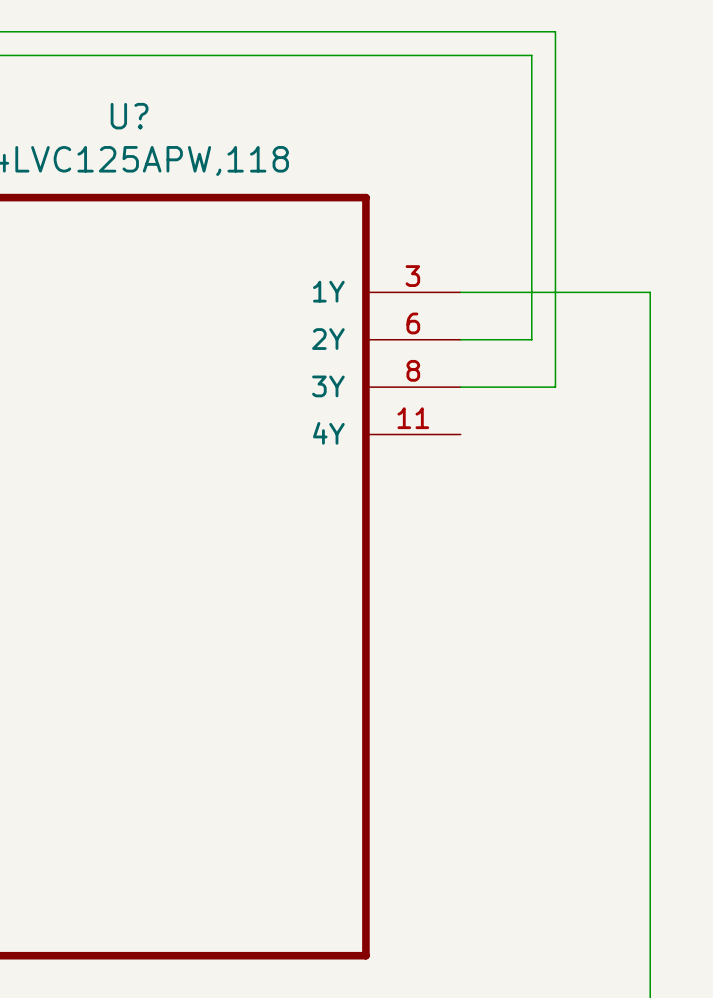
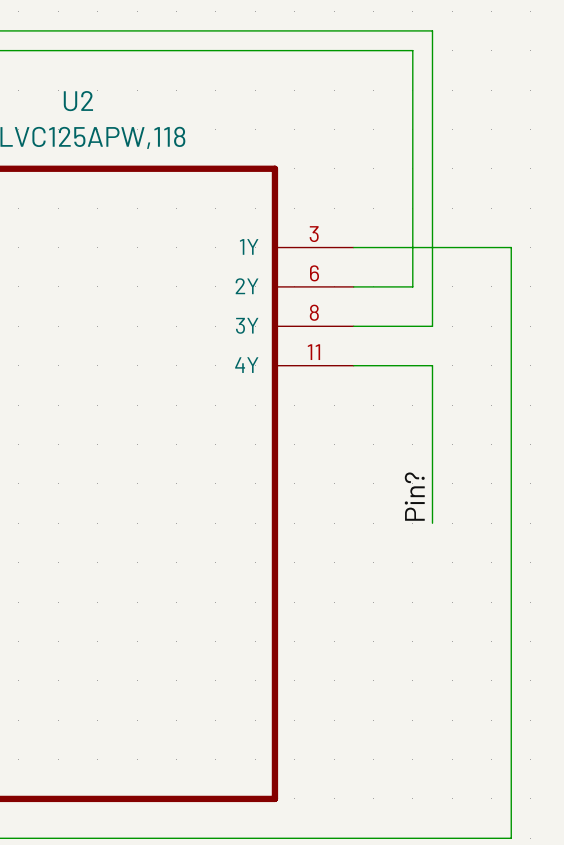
U? name: U? (129, 116) -> U2 (78, 101)
wire: none -> (353, 365) (432, 365) (432, 523)
label: none -> Pin? (414, 496)

